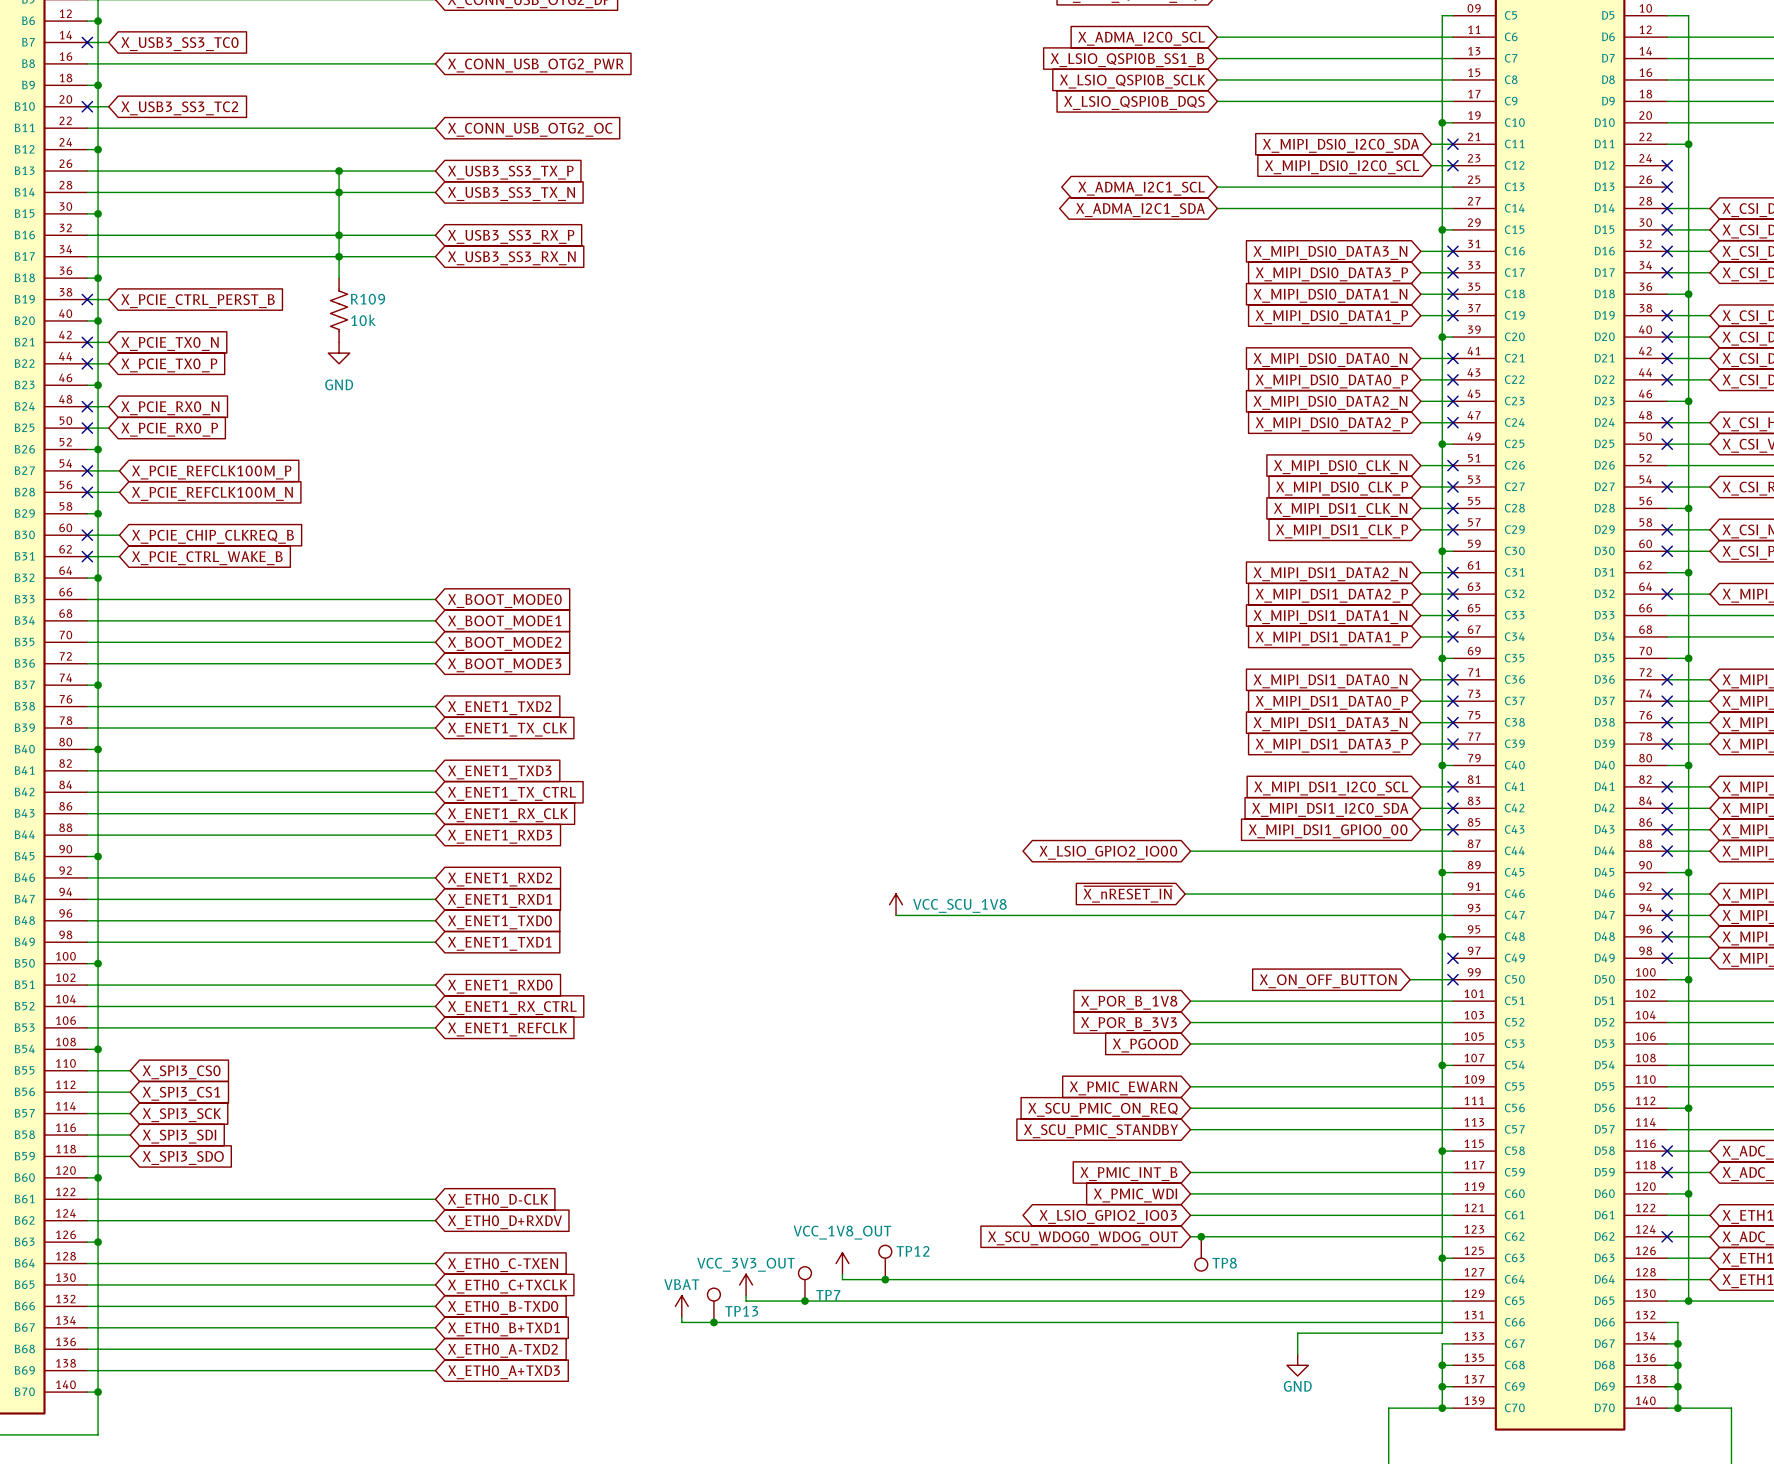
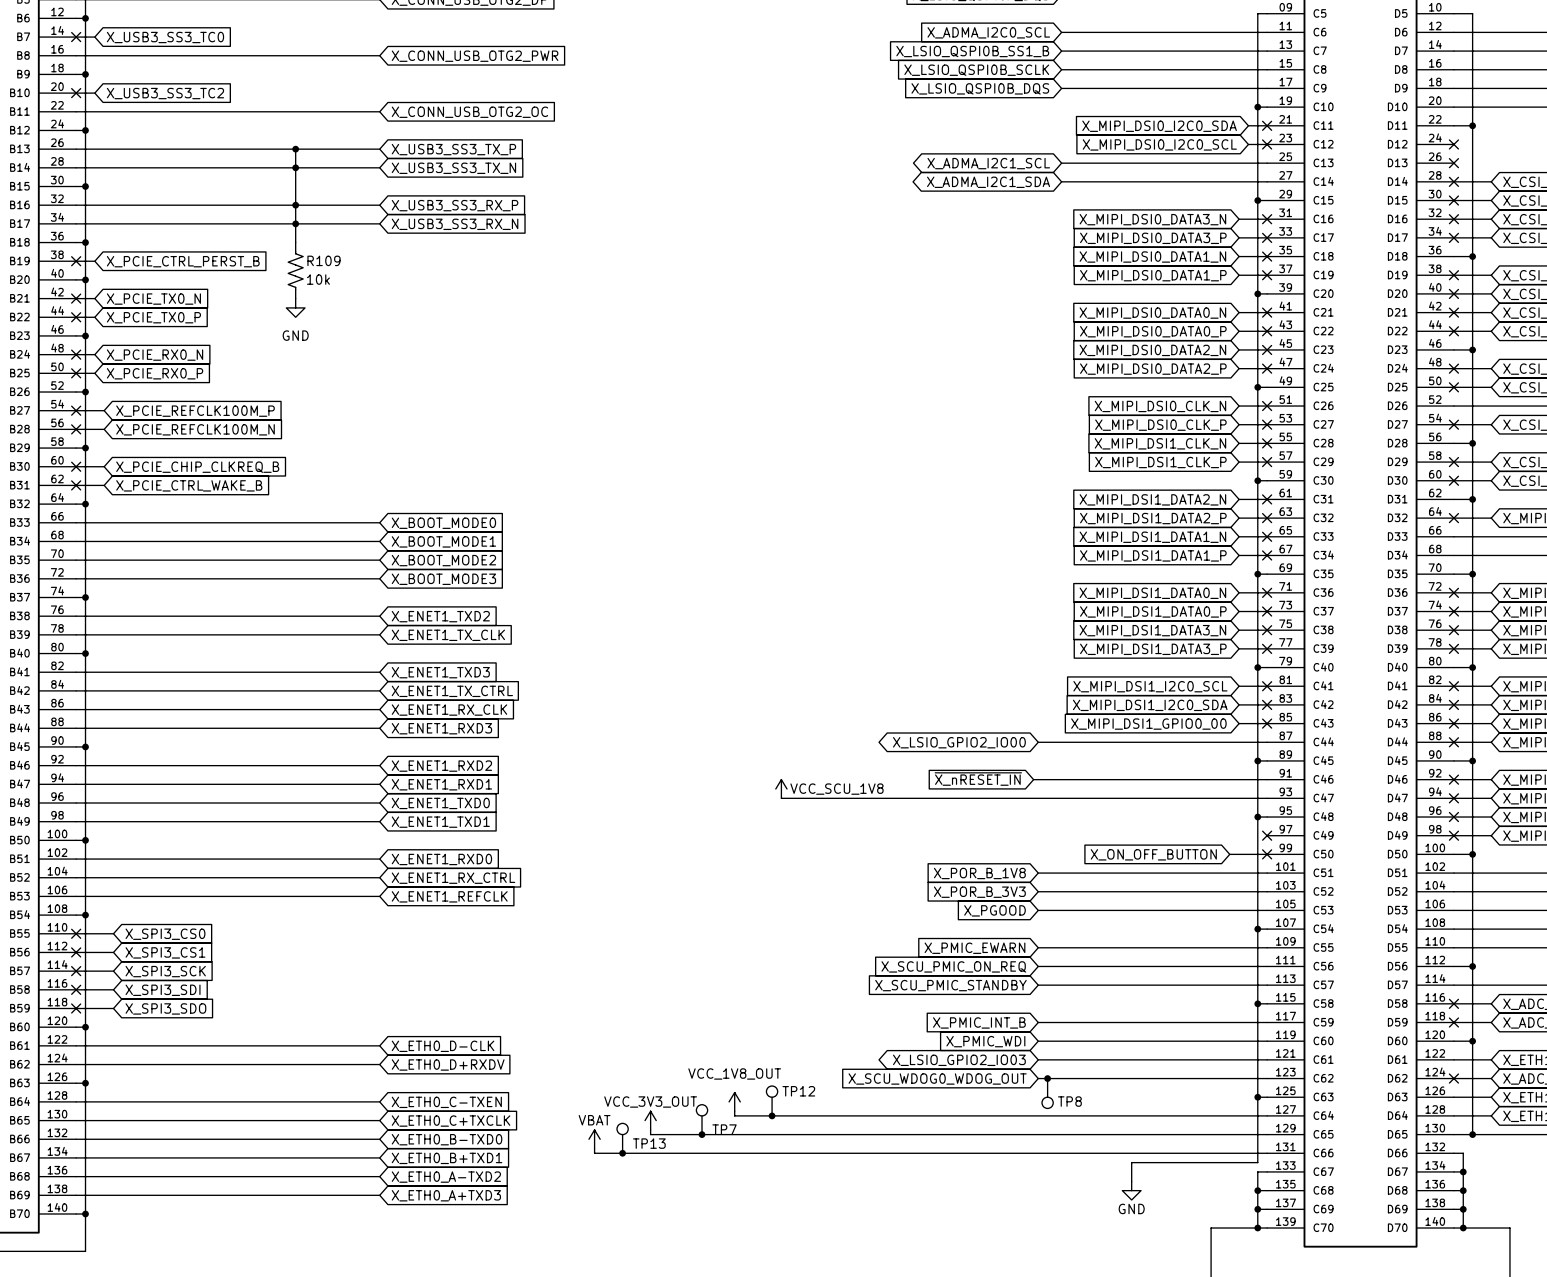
no-connect mark: none -> (76, 933)
no-connect mark: none -> (76, 952)
no-connect mark: none -> (76, 971)
no-connect mark: none -> (76, 989)
no-connect mark: none -> (76, 1008)

